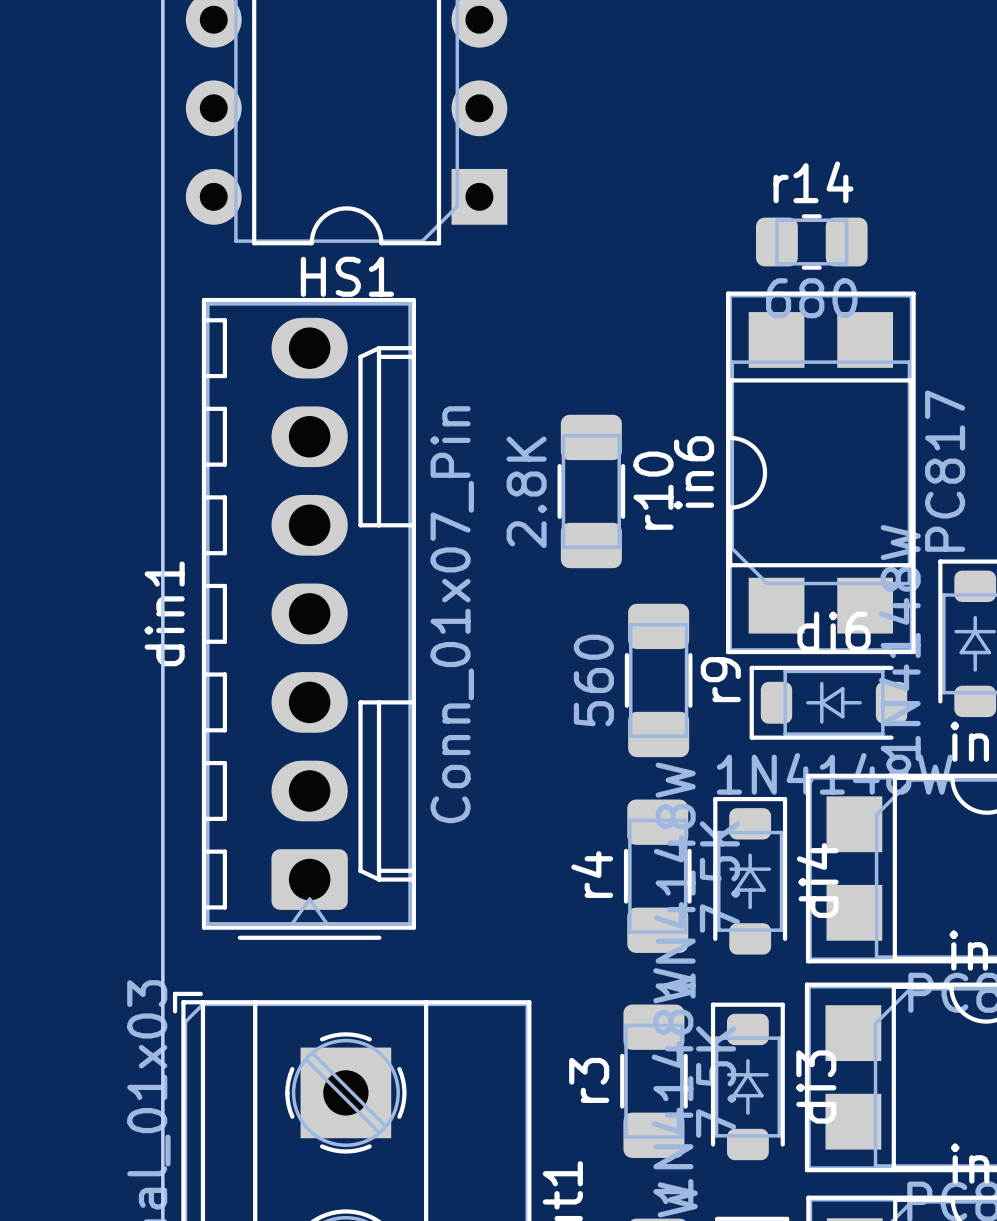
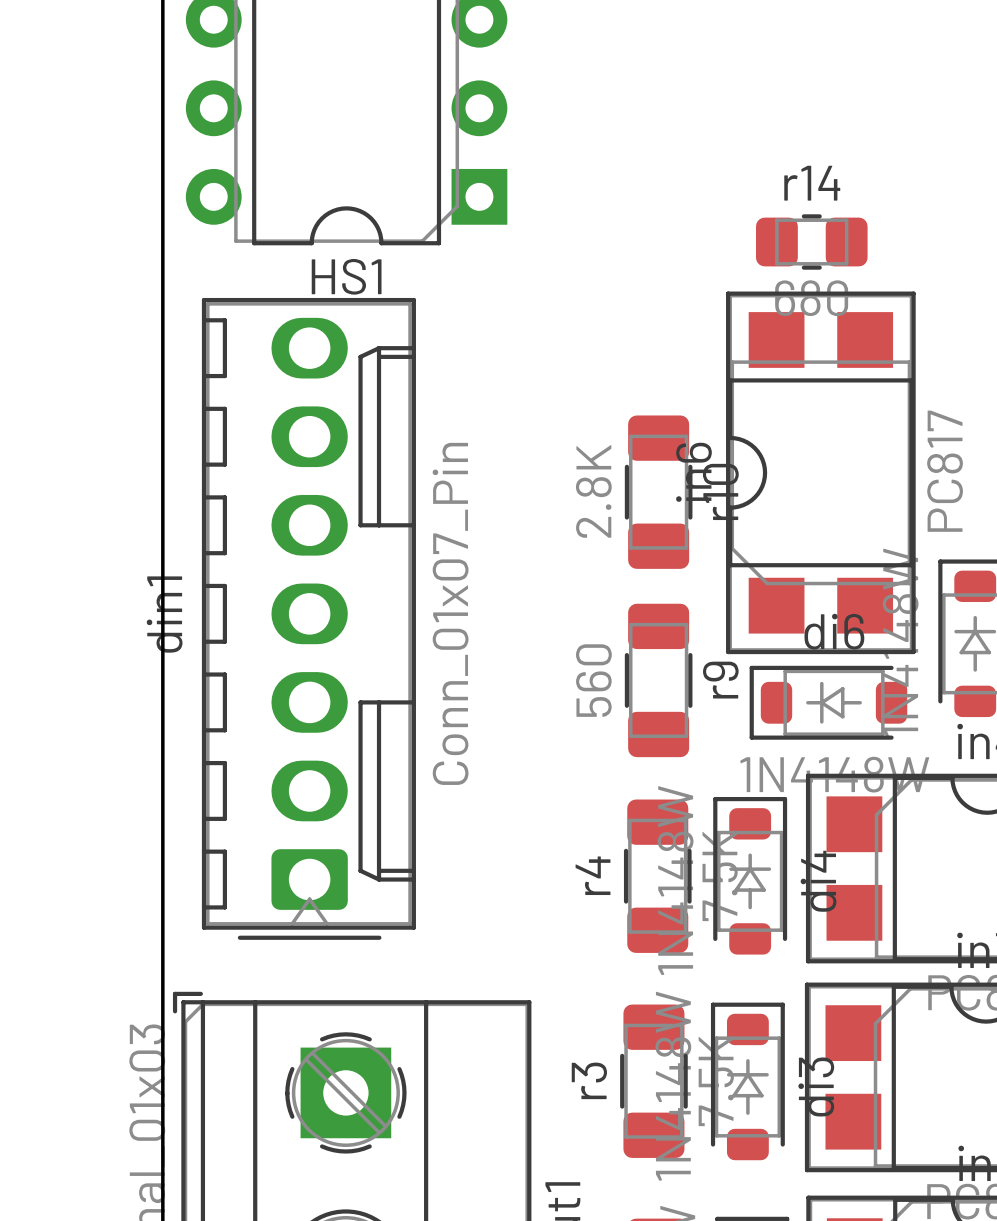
r10 position: (591, 491) -> (658, 492)

